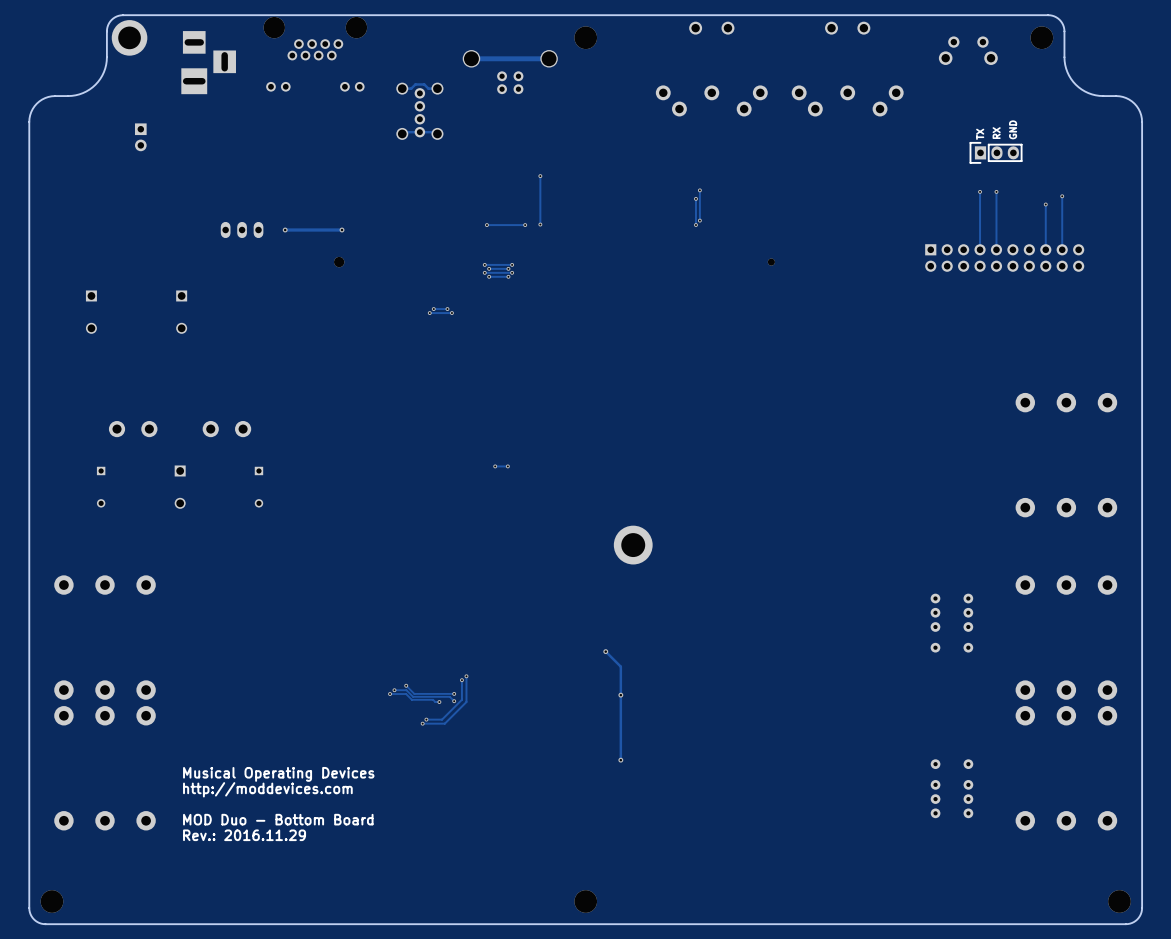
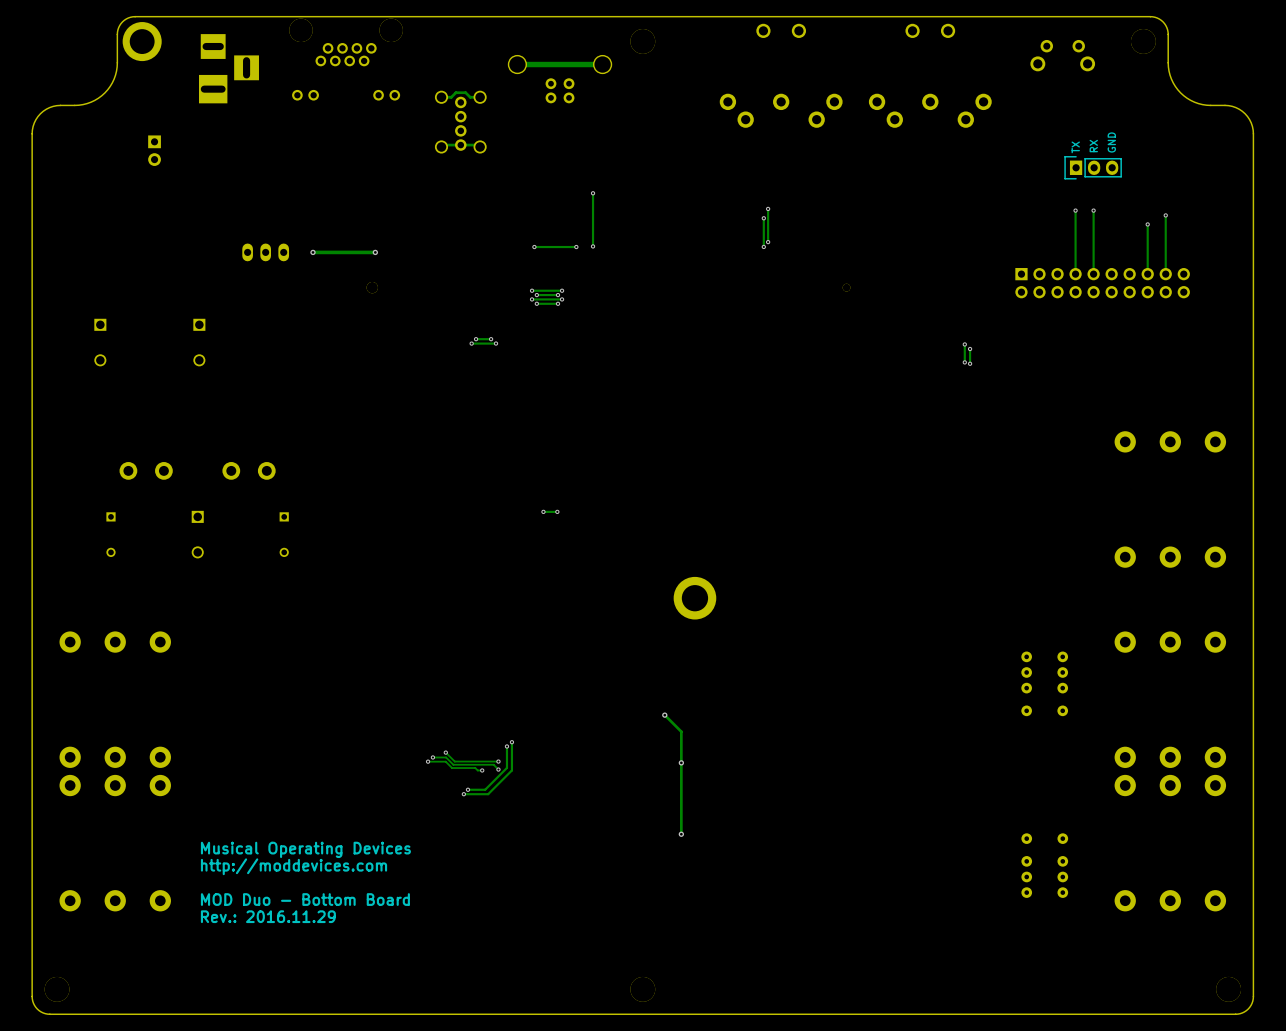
track: none -> (964, 344) (964, 362)
via: none -> (964, 344)
track: none -> (970, 348) (970, 363)
via: none -> (970, 348)
via: none -> (964, 362)
via: none -> (970, 363)

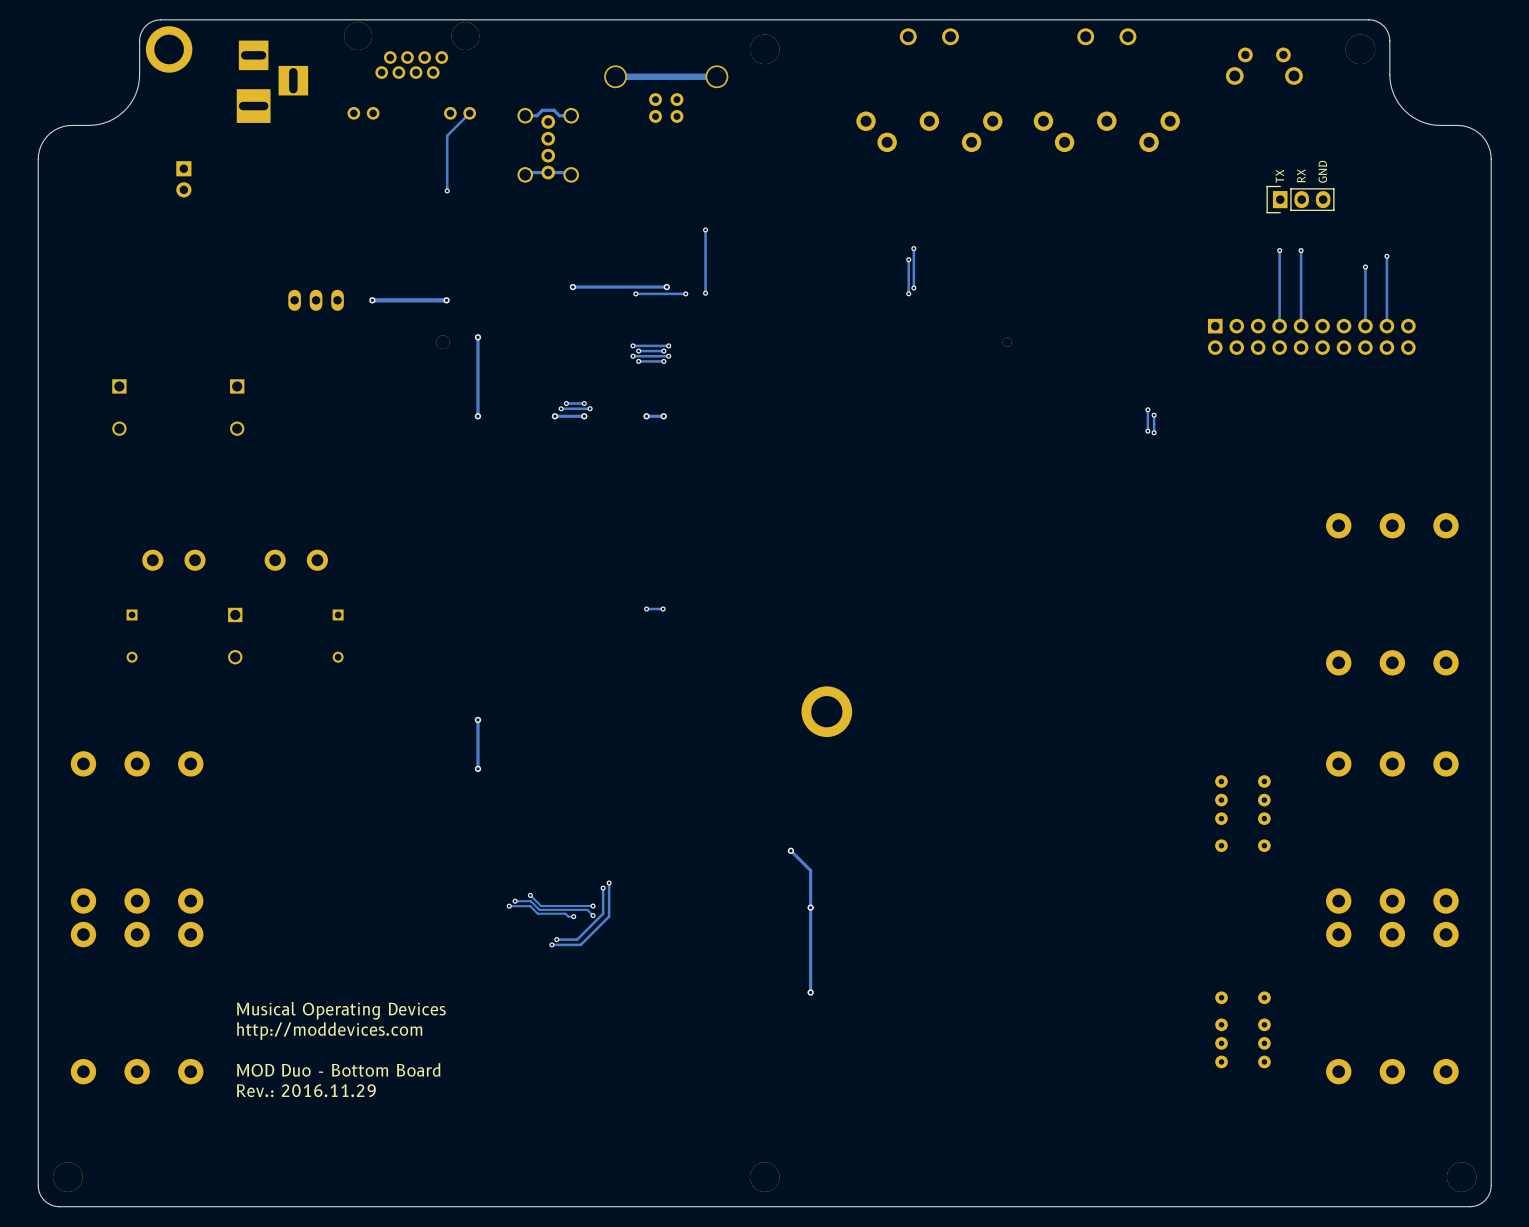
track: none -> (469, 113) (447, 135) (447, 190)
via: none -> (447, 190)
via: none -> (572, 287)
track: none -> (666, 287) (572, 287)
via: none -> (666, 287)
track: none -> (477, 337) (477, 416)
via: none -> (477, 337)
via: none -> (477, 416)
via: none -> (554, 416)
track: none -> (584, 416) (554, 416)
via: none -> (584, 416)
via: none -> (646, 416)
track: none -> (663, 416) (646, 416)
via: none -> (663, 416)
track: none -> (477, 719) (477, 768)
via: none -> (477, 719)
via: none -> (477, 768)

